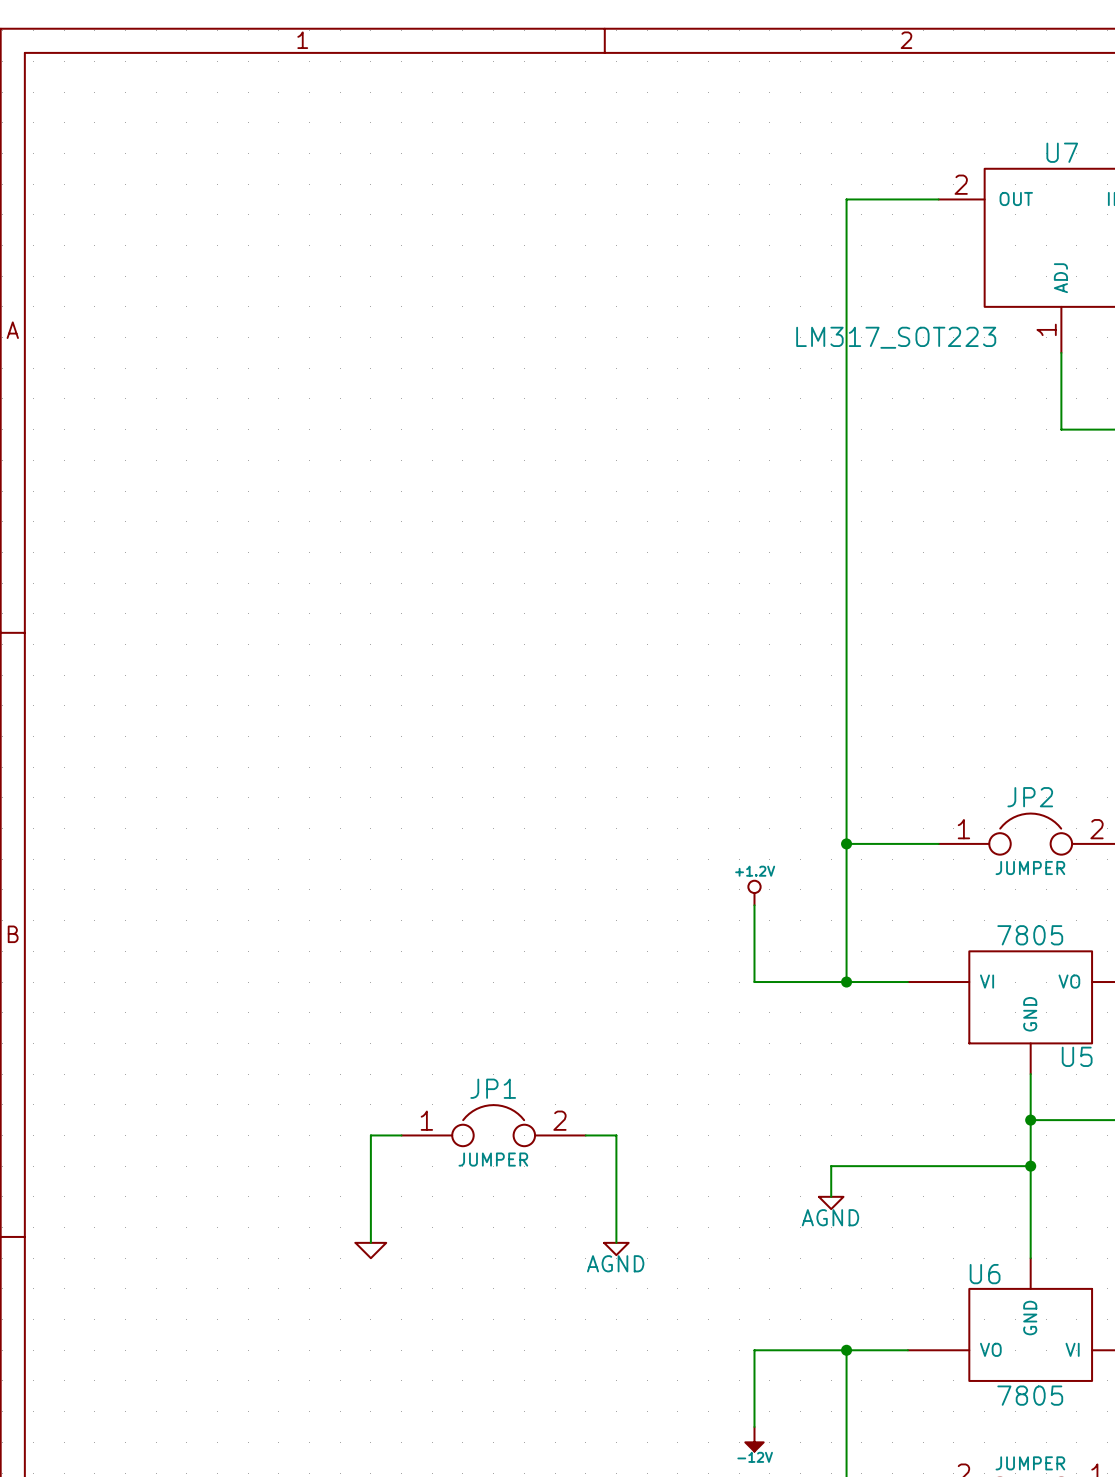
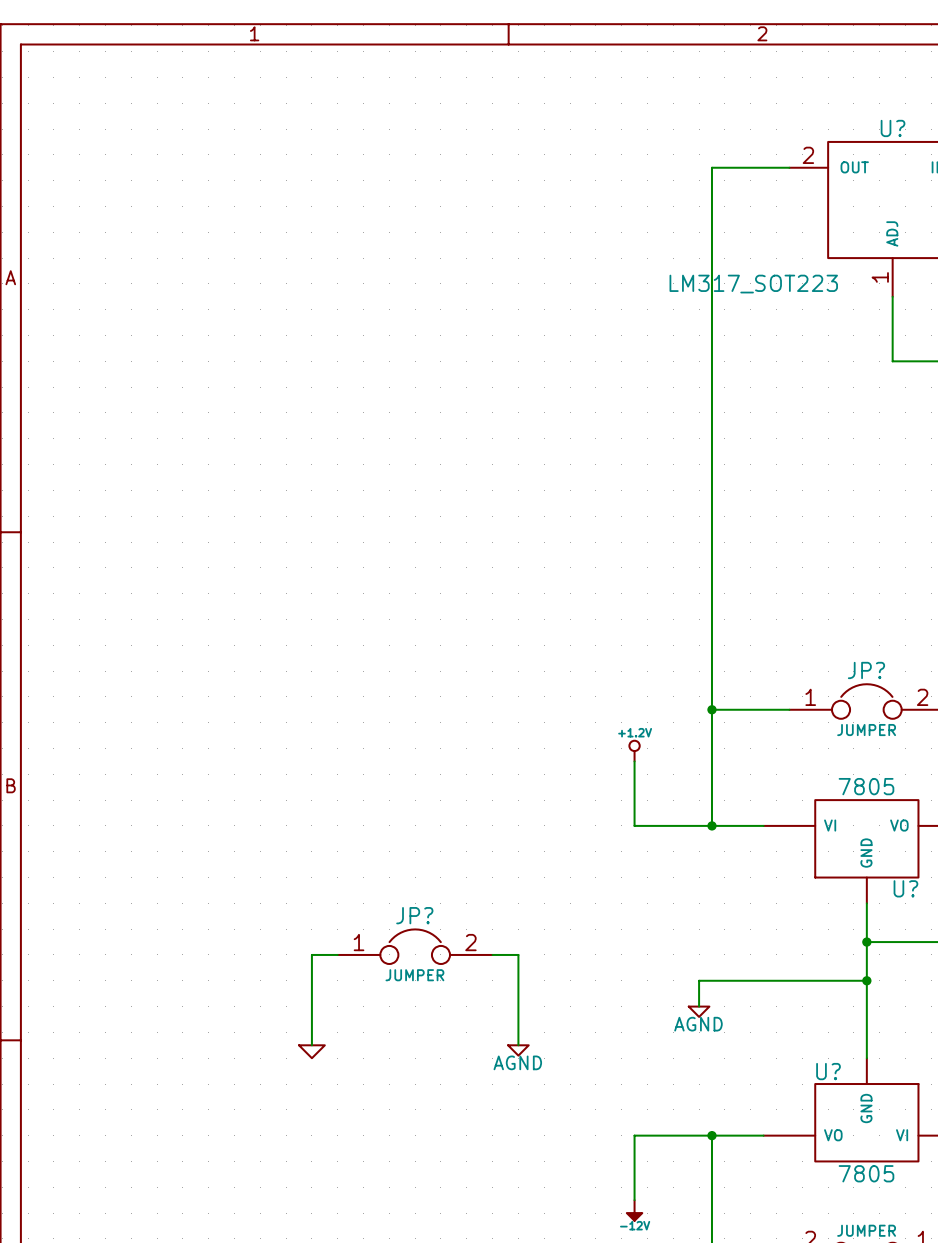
U7 name: U7 (1062, 152) -> U? (893, 128)
JP2 name: JP2 (1030, 797) -> JP? (866, 670)
U5 name: U5 (1077, 1056) -> U? (905, 888)
JP1 name: JP1 (493, 1088) -> JP? (414, 915)
U6 name: U6 (985, 1274) -> U? (828, 1071)

